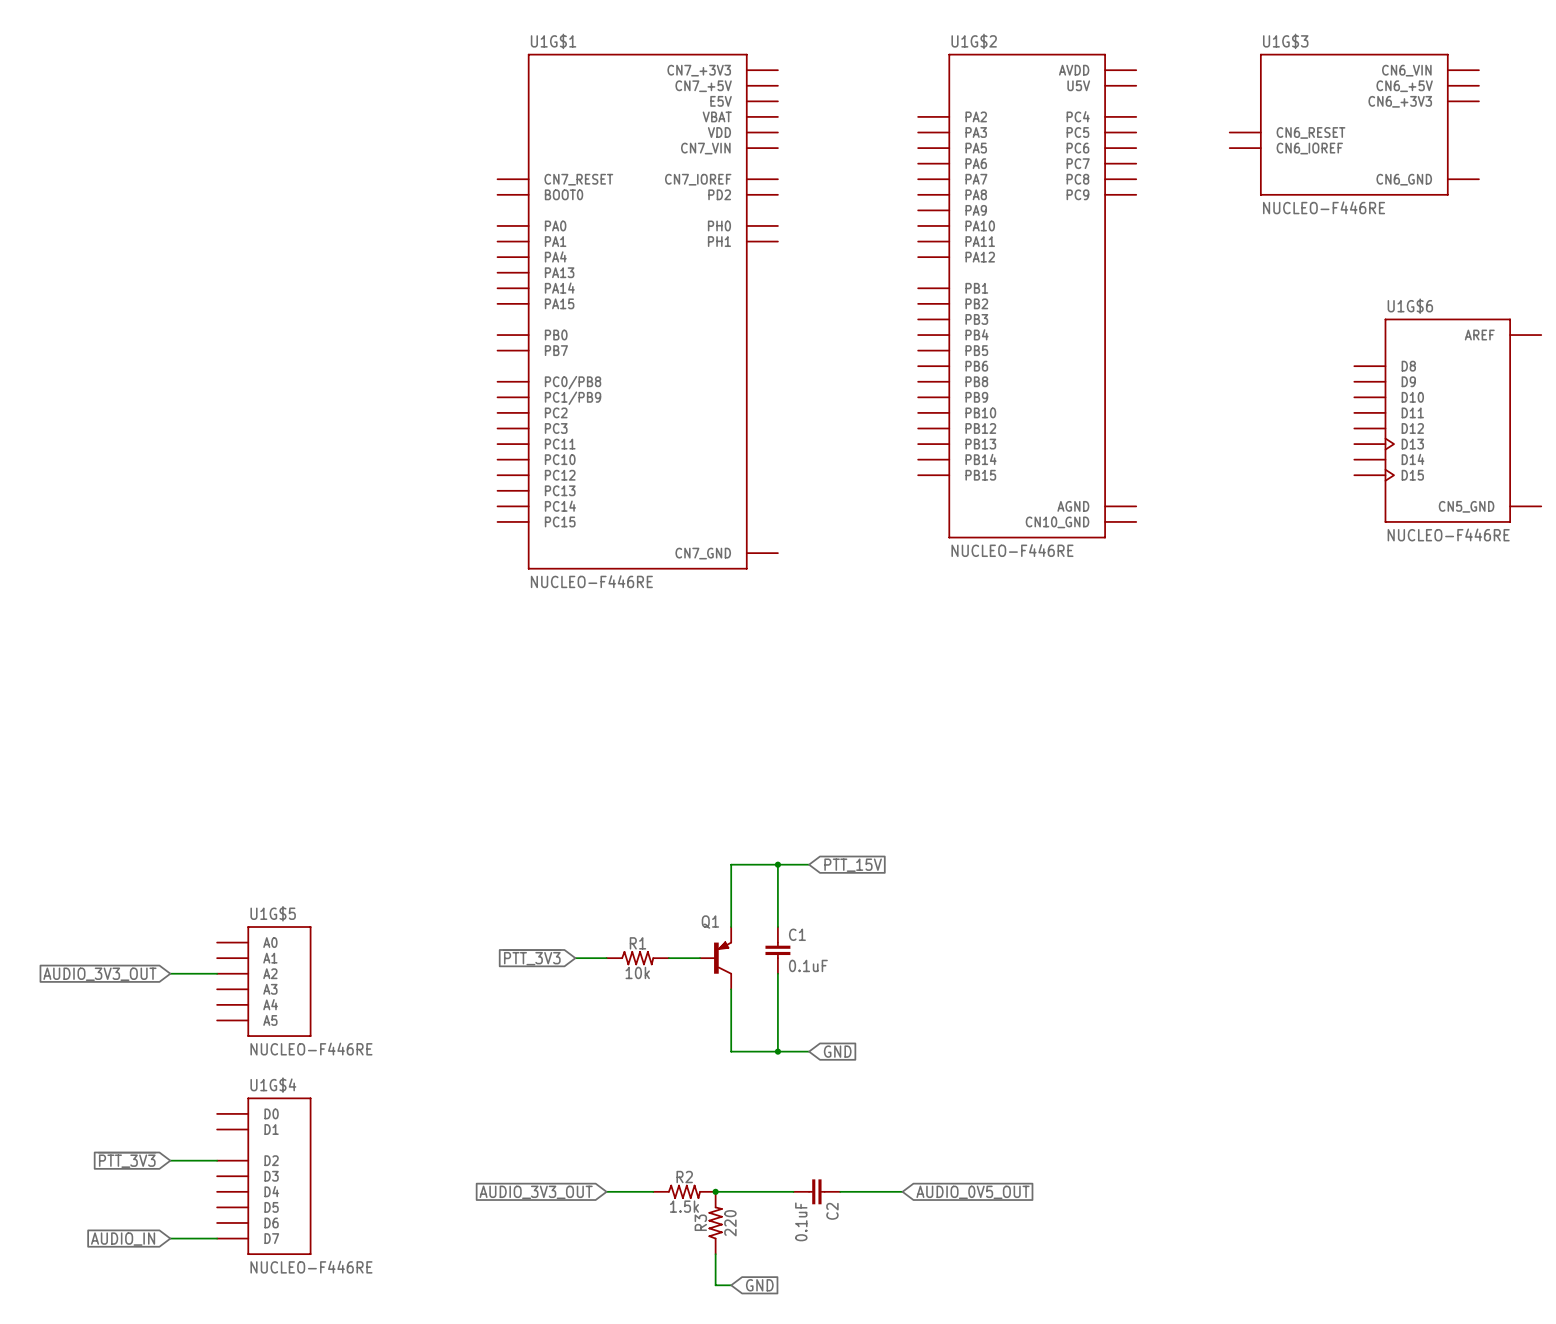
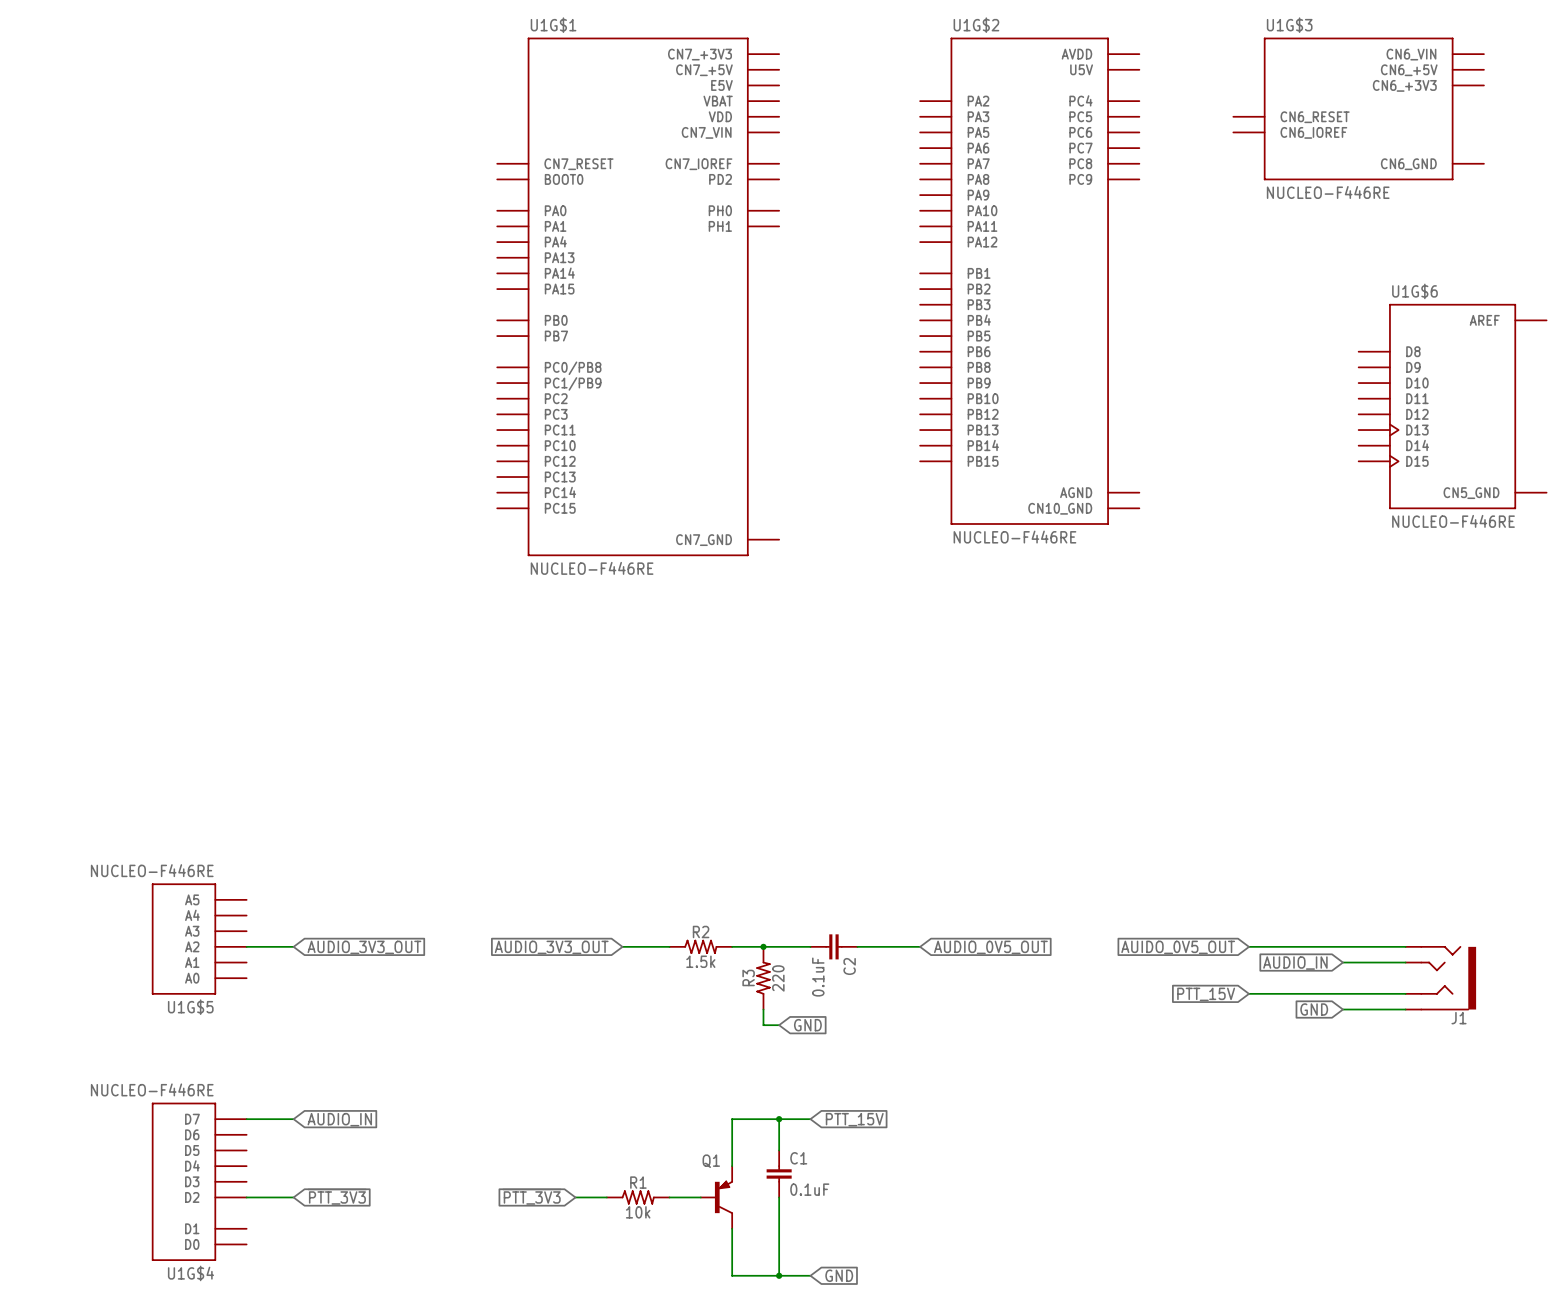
wire: (777, 864) (777, 927) -> none
junction: (777, 864) -> none
wire: (809, 864) (731, 864) (731, 927) -> none
global label: PTT_15V (853, 865) -> none
C1 position: (777, 950) -> (779, 1173)
global label: ~{PTT_3V3} (532, 957) -> none
global label: none -> AUDIO_3V3_OUT (551, 947)
wire: (575, 958) (606, 958) -> none
R1 position: (637, 958) -> (638, 1197)
Q1 position: (715, 958) -> (716, 1197)
wire: none -> (732, 946) (810, 946)
junction: none -> (763, 946)
wire: none -> (857, 946) (920, 946)
global label: none -> AUDIO_0V5_OUT (990, 947)
global label: none -> AUIDO_0V5_OUT (1178, 947)
wire: none -> (1249, 946) (1405, 946)
wire: (170, 973) (217, 973) -> (246, 946) (293, 946)
wire: (777, 973) (777, 1051) -> none
wire: none -> (1342, 962) (1405, 962)
global label rotation: 0° (99, 974) -> 180° (364, 947)
global label position: AUDIO_3V3_OUT (99, 974) -> AUDIO_3V3_OUT (364, 947)
global label: none -> AUDIO_IN (1295, 963)
U1G$5 position: (264, 981) -> (199, 939)
U1G$5 rotation: 0° (279, 981) -> 180° (183, 939)
wire: (731, 989) (731, 1051) (809, 1051) -> none
J1: none -> (1440, 978)
wire: none -> (1249, 993) (1405, 993)
global label: none -> PTT_15V (1206, 994)
wire: none -> (763, 1009) (763, 1025) (779, 1025)
global label: none -> GND (1314, 1009)
wire: none -> (1342, 1009) (1405, 1009)
junction: (777, 1051) -> none
global label position: GND (837, 1051) -> GND (807, 1025)
wire: none -> (779, 1119) (779, 1150)
junction: none -> (779, 1119)
wire: none -> (810, 1119) (732, 1119) (732, 1166)
global label: none -> AUDIO_IN (339, 1119)
global label: none -> PTT_15V (854, 1119)
global label rotation: 0° (127, 1159) -> 180° (337, 1196)
global label position: ~{PTT_3V3} (127, 1159) -> ~{PTT_3V3} (337, 1196)
wire: (170, 1160) (217, 1160) -> (246, 1119) (293, 1119)
U1G$4 rotation: 0° (279, 1176) -> 180° (183, 1181)
wire: (606, 1191) (653, 1191) -> none
R2 position: (684, 1191) -> (700, 946)
wire: (715, 1191) (793, 1191) -> none
junction: (715, 1191) -> none
C2 position: (816, 1191) -> (833, 946)
wire: (840, 1191) (902, 1191) -> none
global label: AUDIO_3V3_OUT (536, 1192) -> none
global label: AUDIO_0V5_OUT (973, 1192) -> none
global label: none -> ~{PTT_3V3} (531, 1196)
wire: none -> (575, 1197) (606, 1197)
wire: none -> (669, 1197) (700, 1197)
wire: none -> (779, 1197) (779, 1275)
R3 position: (715, 1222) -> (763, 978)
wire: (170, 1238) (217, 1238) -> (246, 1197) (293, 1197)
wire: none -> (732, 1228) (732, 1275) (810, 1275)
global label: AUDIO_IN (123, 1239) -> none
wire: (715, 1254) (715, 1285) (731, 1285) -> none
global label position: GND (759, 1285) -> GND (839, 1275)
junction: none -> (779, 1275)

